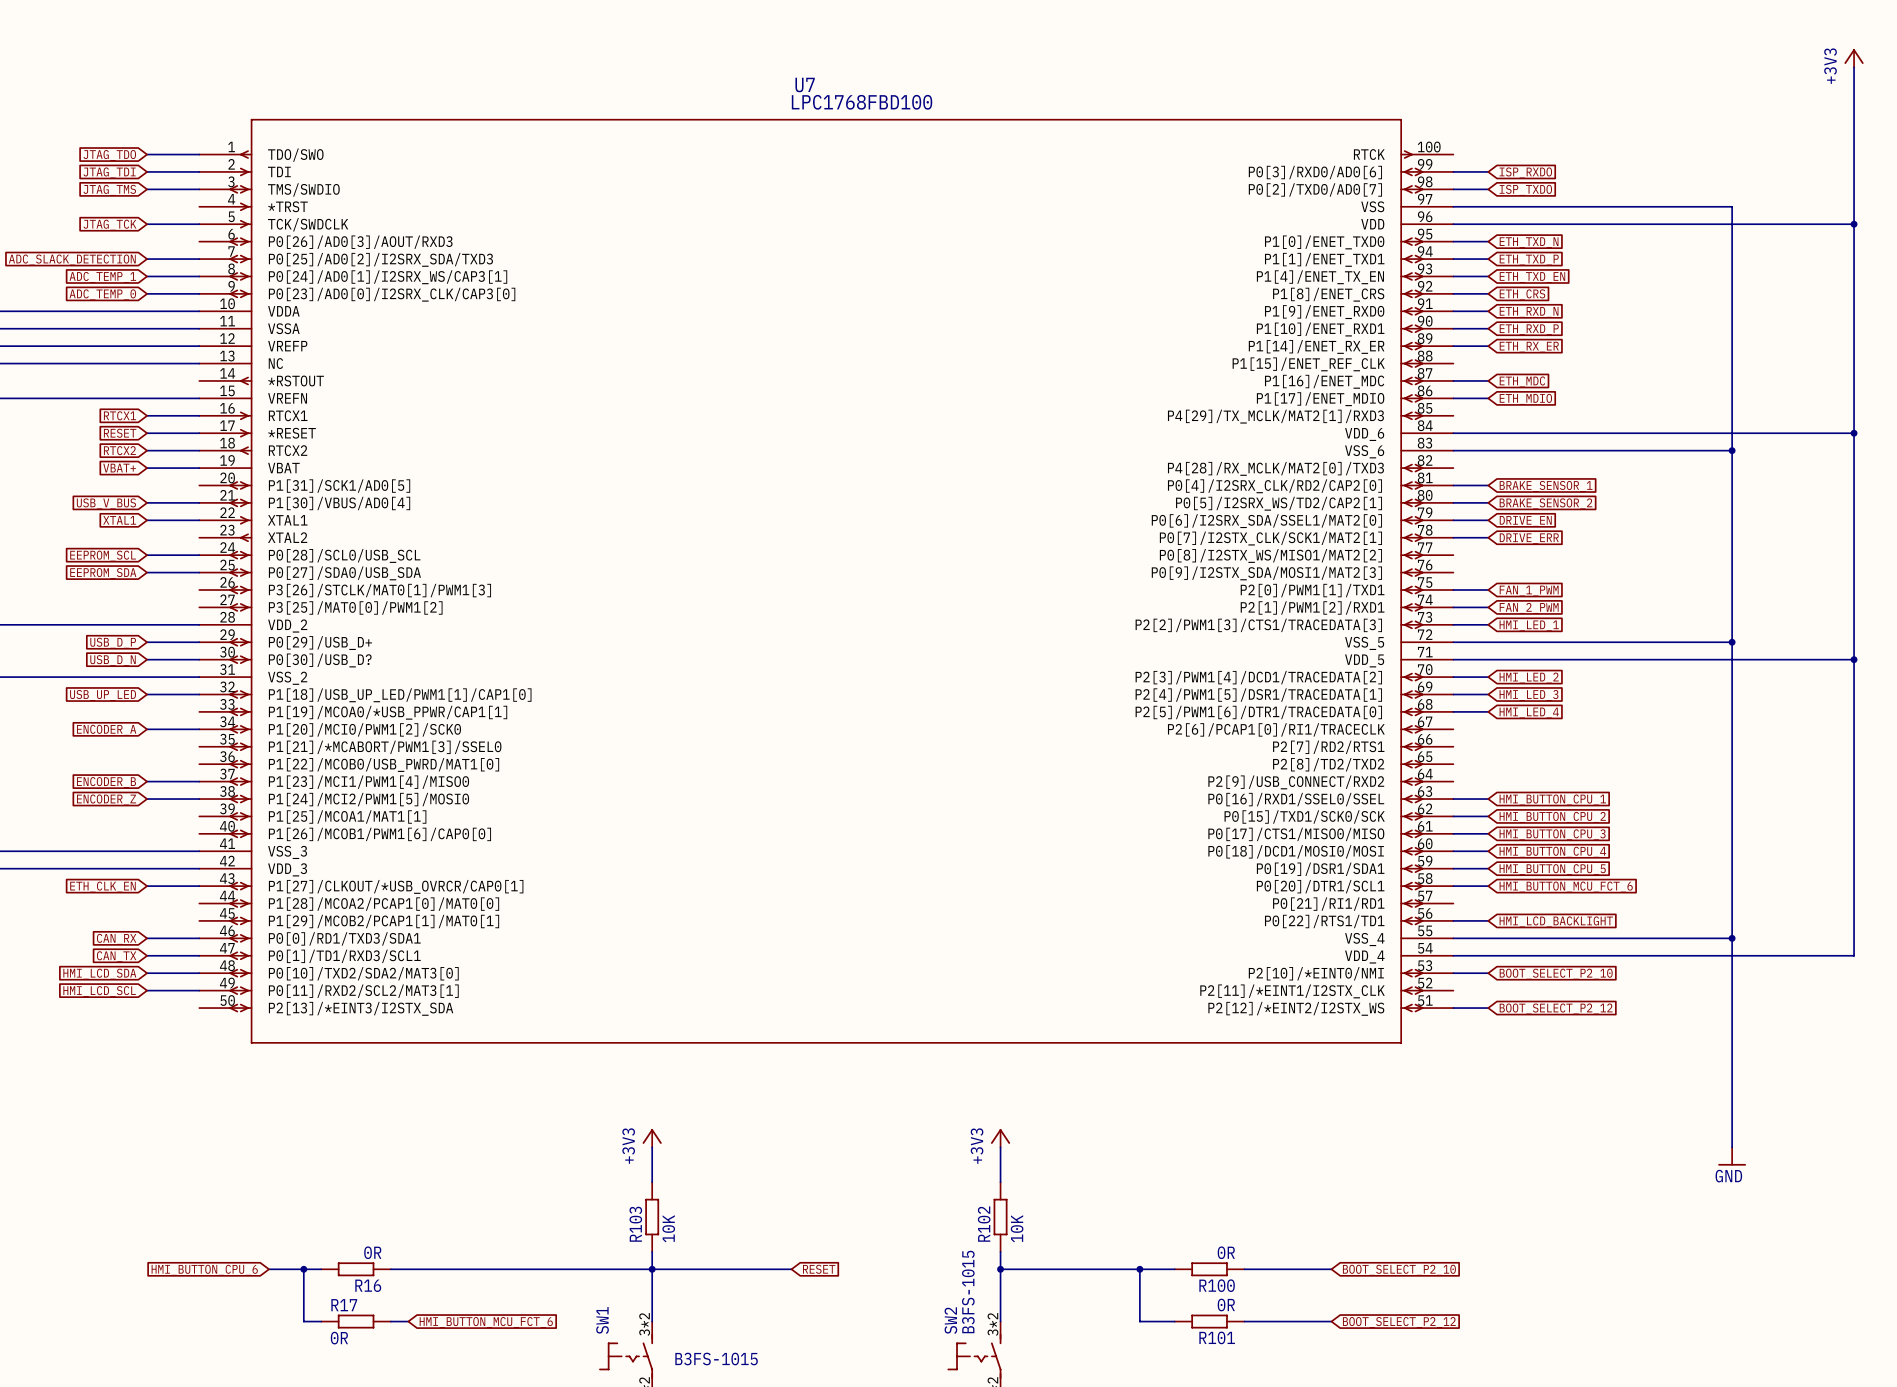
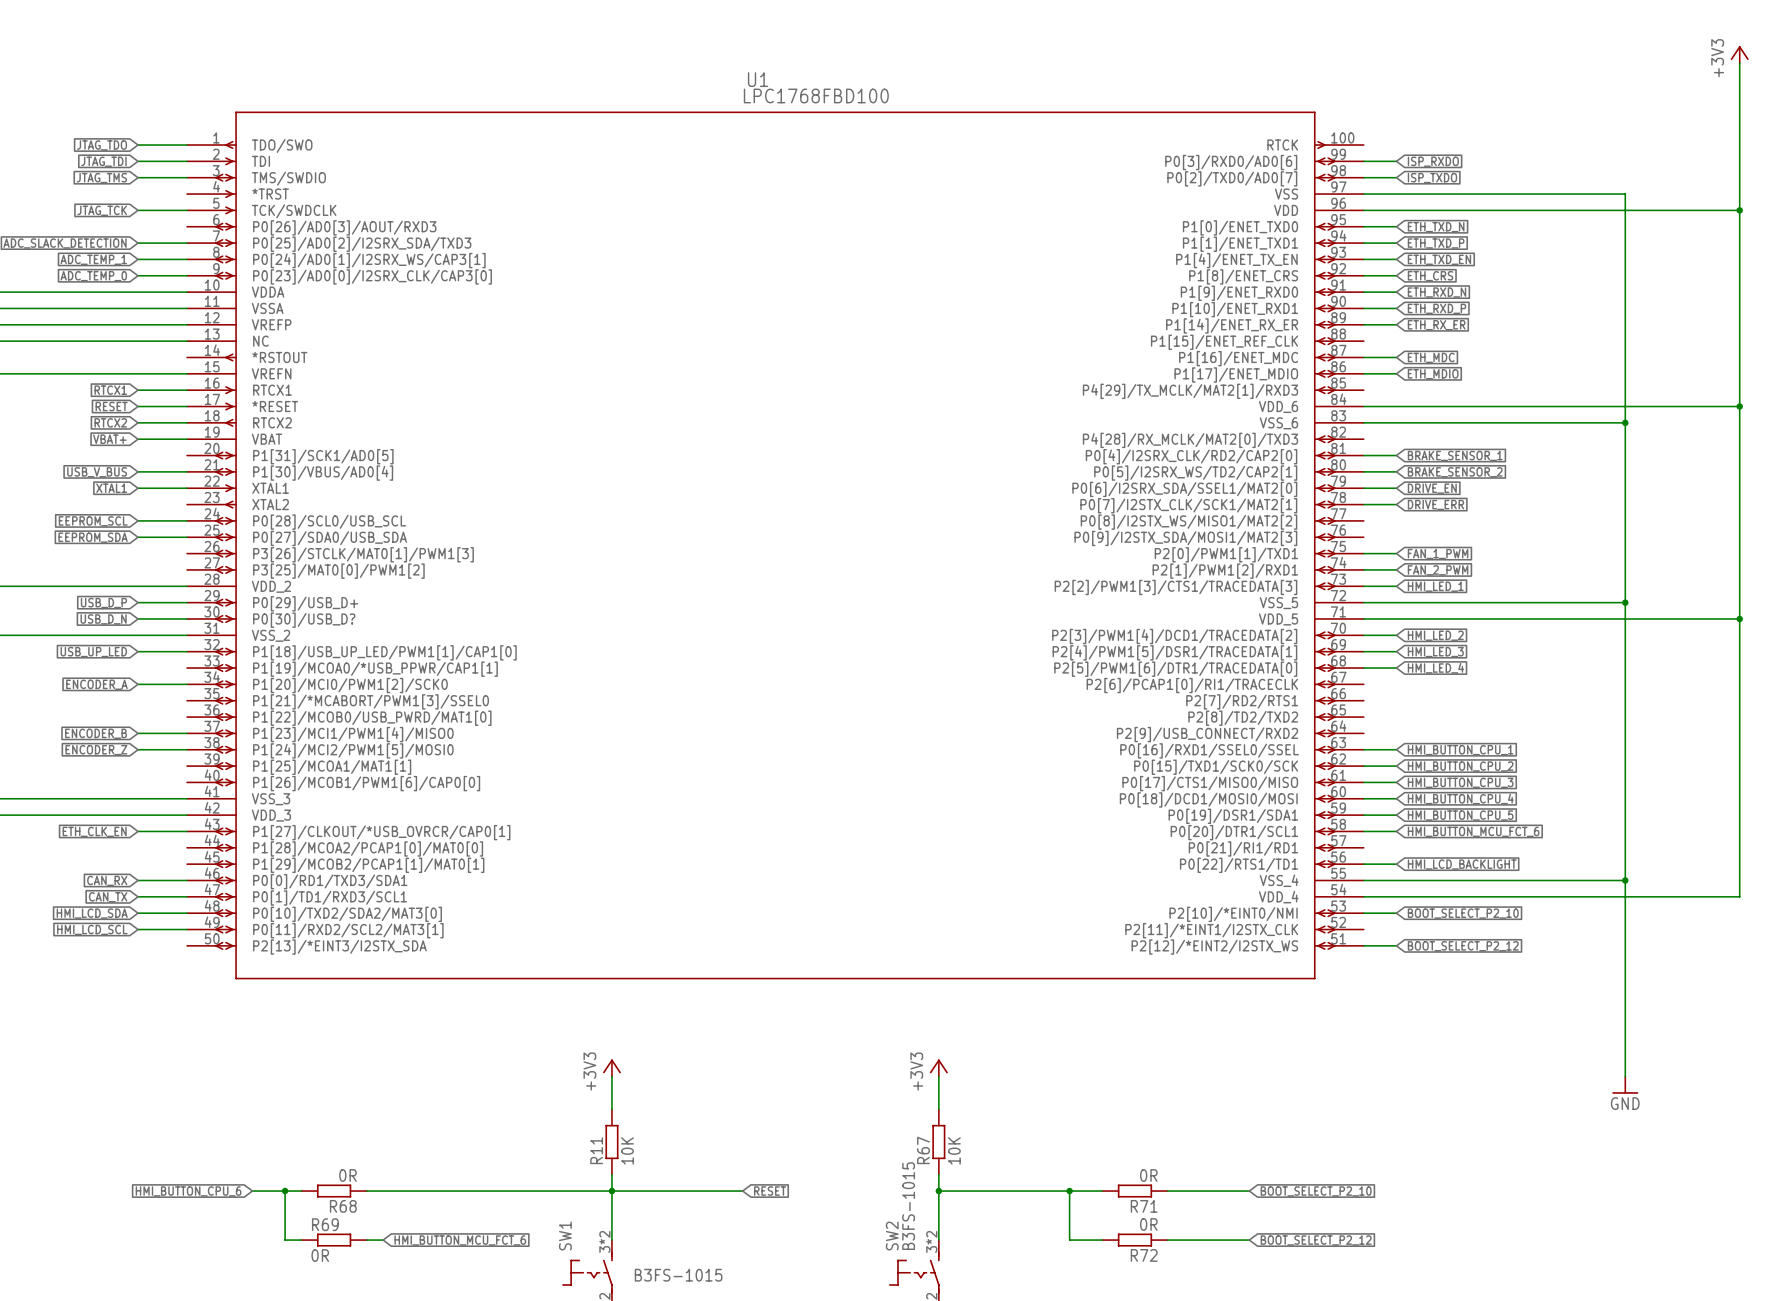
U7 name: U7 (805, 84) -> U1 (758, 79)
R103 name: R103 (635, 1224) -> R11 (596, 1150)
R102 name: R102 (984, 1224) -> R67 (923, 1150)
R16 name: R16 (368, 1285) -> R68 (343, 1206)
R100 name: R100 (1217, 1285) -> R71 (1144, 1206)
R17 name: R17 (344, 1305) -> R69 (325, 1224)
R101 name: R101 (1217, 1337) -> R72 (1144, 1255)

